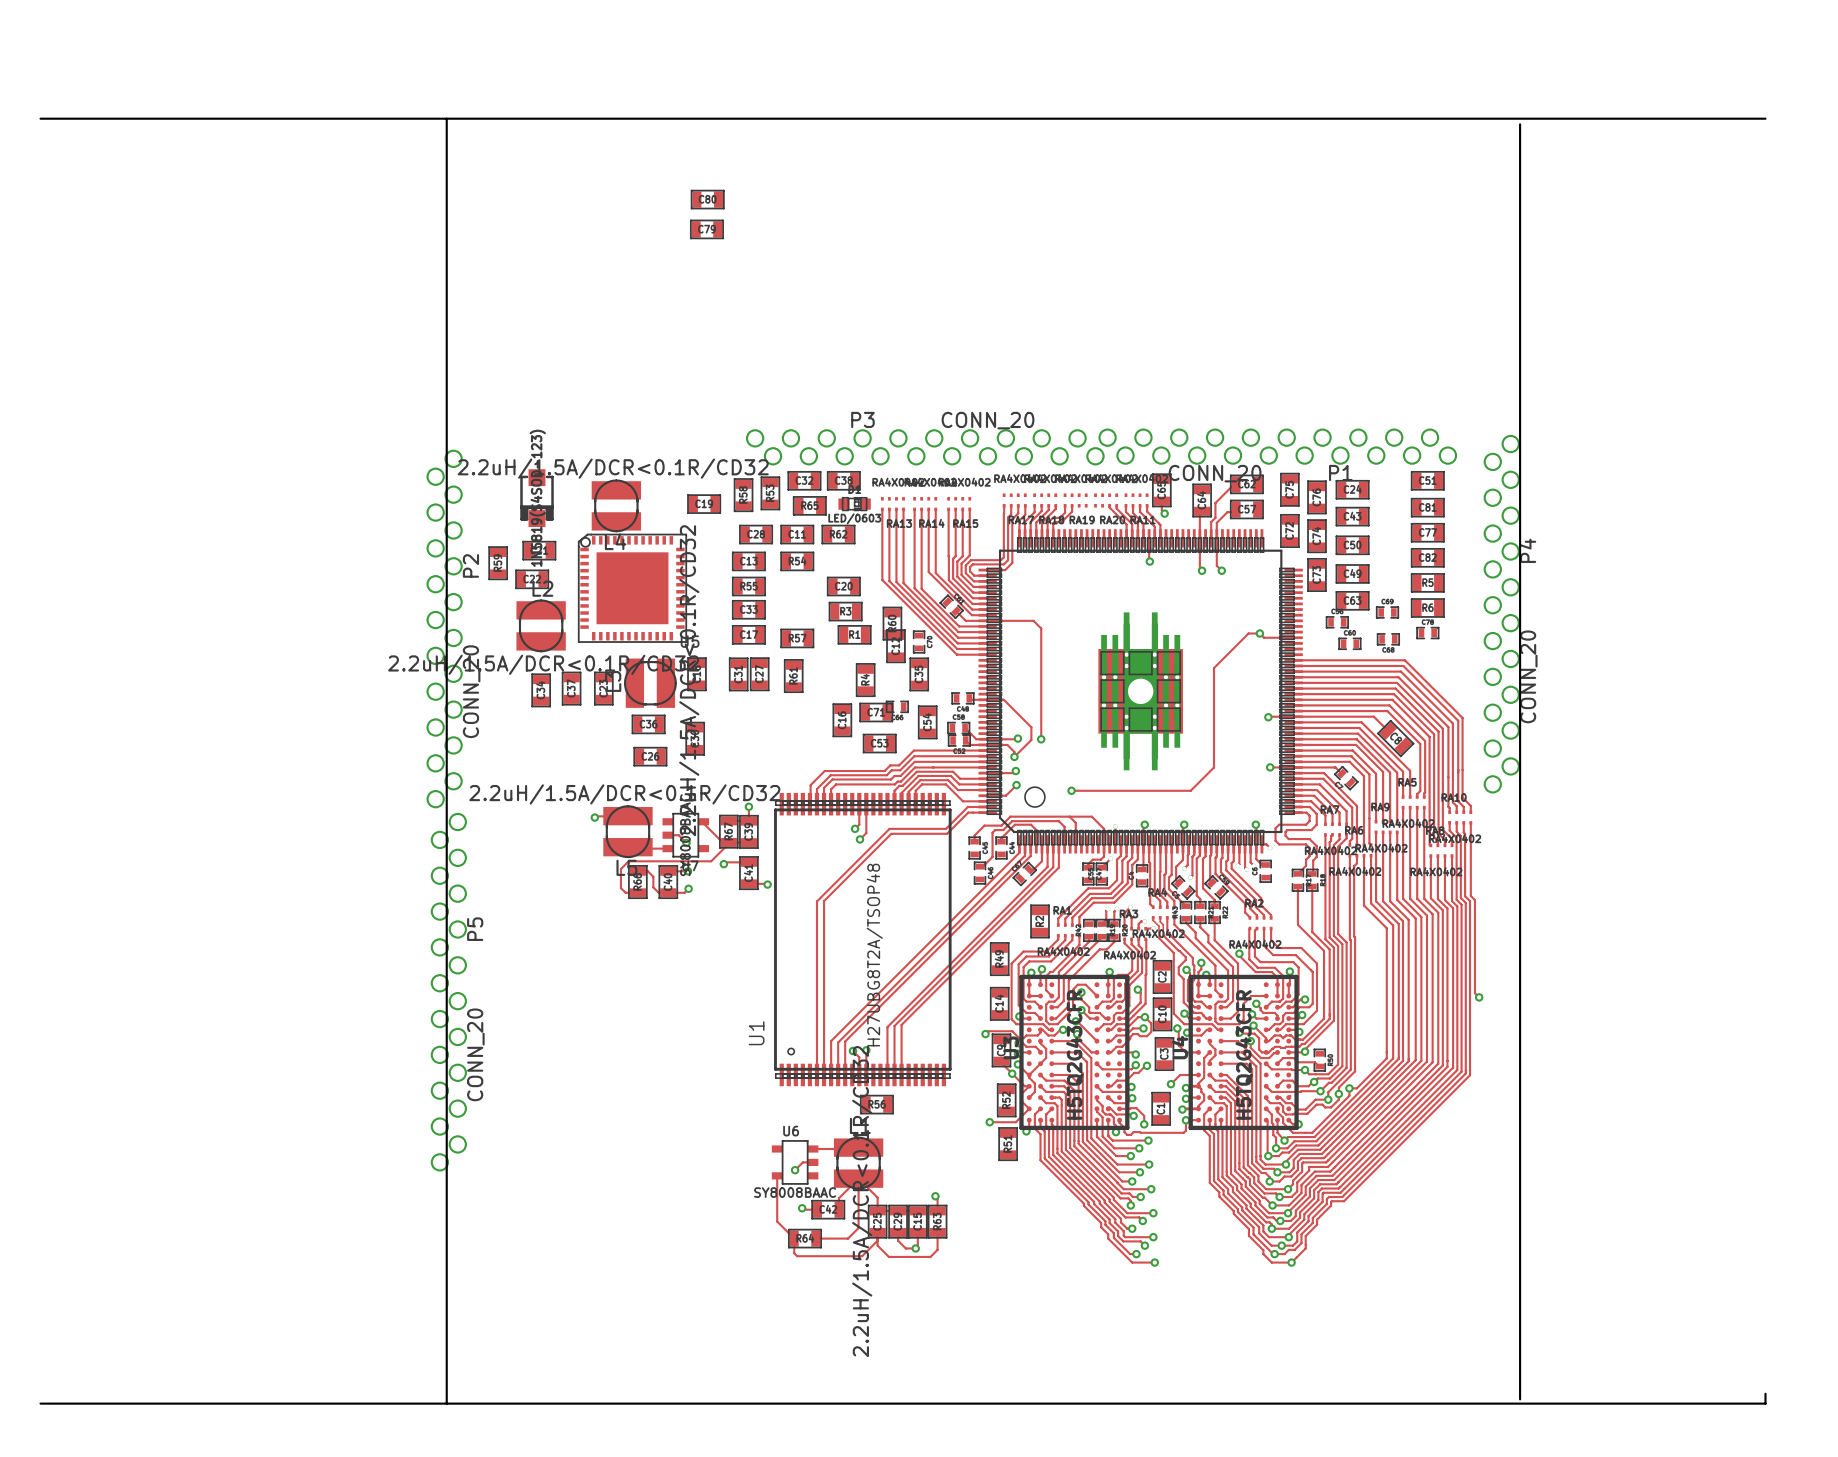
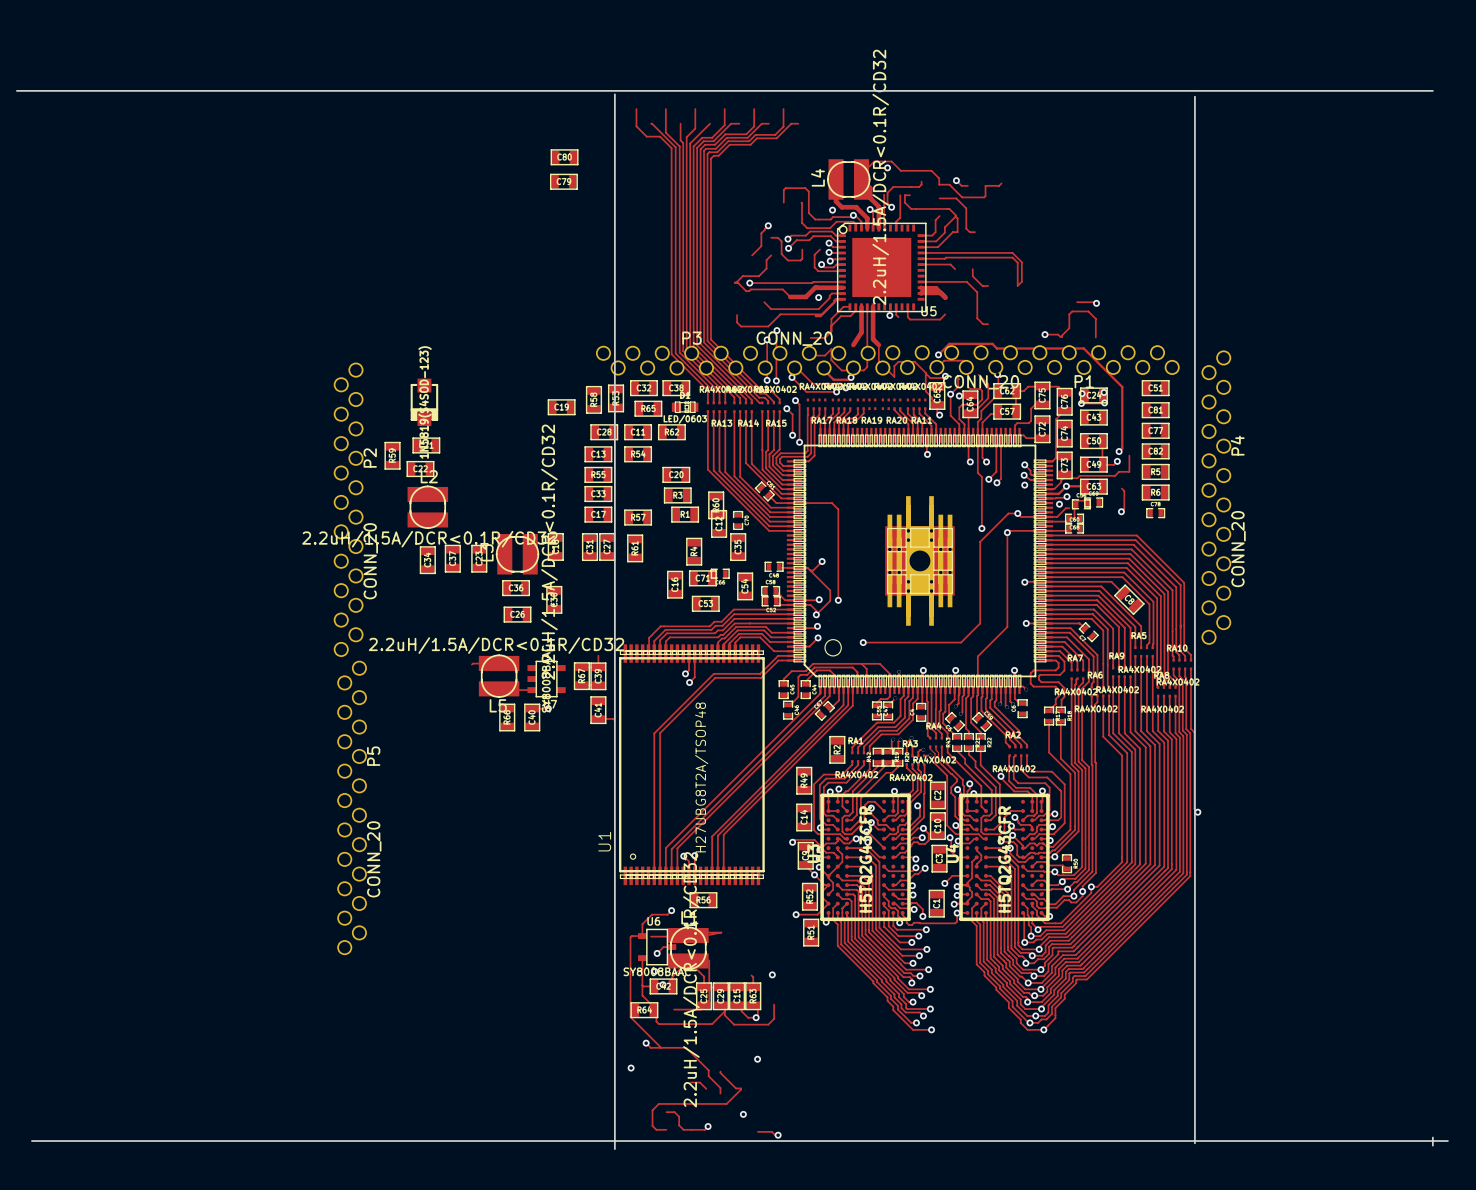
board edge: (446, 118) (446, 1403) -> (614, 94) (614, 1149)
board edge: (1520, 124) (1520, 1399) -> (1194, 96) (1194, 1143)
track: none -> (636, 109) (636, 126) (646, 136) (660, 136) (671, 148) (671, 354) (707, 390) (707, 402)
track: none -> (665, 109) (665, 132) (679, 146) (679, 352) (719, 392) (719, 402)
track: none -> (695, 109) (695, 128) (686, 137) (686, 349) (734, 397) (734, 402)
track: none -> (724, 109) (724, 125) (712, 137) (702, 137) (693, 146) (693, 346) (745, 399) (745, 402)
track: none -> (754, 109) (754, 126) (746, 134) (725, 134) (715, 144) (705, 144) (700, 149) (700, 343) (759, 402) (762, 402)
track: none -> (783, 109) (783, 126) (775, 134) (755, 134) (749, 141) (728, 141) (717, 152) (707, 153) (707, 341) (760, 393) (765, 393) (773, 402)
track: none -> (651, 123) (675, 147) (675, 353) (713, 391) (713, 402)
track: none -> (680, 123) (680, 140) (683, 142) (683, 351) (725, 393) (725, 402)
track: none -> (710, 123) (690, 143) (690, 348) (740, 398) (740, 402)
track: none -> (739, 123) (731, 123) (713, 141) (703, 141) (697, 147) (697, 345) (751, 400) (751, 402)
track: none -> (768, 123) (761, 123) (747, 137) (726, 137) (715, 148) (706, 148) (704, 150) (704, 342) (759, 397) (764, 397) (768, 402)
track: none -> (798, 123) (791, 123) (776, 138) (756, 138) (750, 144) (729, 144) (718, 155) (713, 155) (710, 158) (710, 339) (761, 390) (770, 390) (779, 399) (779, 402)
via: none -> (887, 167)
track: none -> (836, 179) (836, 201) (841, 207) (856, 207) (867, 218) (867, 228)
track: none -> (861, 179) (861, 174) (874, 161) (891, 161) (900, 170) (931, 170) (939, 178) (939, 184) (949, 184) (962, 197) (984, 197) (985, 185) (999, 185) (1001, 183)
track: none -> (861, 179) (870, 188) (870, 197) (878, 206) (878, 228)
track: none -> (956, 180) (961, 185) (967, 185)
via: none -> (956, 180)
track: none -> (921, 181) (919, 186) (893, 186) (887, 192) (887, 203) (891, 207)
track: none -> (884, 194) (884, 228)
track: none -> (900, 195) (900, 217) (896, 221) (896, 228)
track: none -> (909, 195) (904, 195) (904, 202) (911, 208) (949, 208) (955, 216)
track: none -> (939, 198) (956, 198) (966, 208) (966, 228) (969, 232) (974, 232)
track: none -> (783, 202) (783, 190) (785, 188) (805, 188) (808, 191) (808, 213) (815, 219) (830, 219) (833, 217) (855, 215) (861, 221) (861, 228)
track: none -> (801, 202) (802, 222) (807, 228) (830, 228) (836, 221) (853, 221) (855, 228)
via: none -> (891, 207)
via: none -> (832, 210)
track: none -> (870, 209) (873, 212) (873, 228)
via: none -> (870, 209)
via: none -> (853, 215)
track: none -> (939, 216) (935, 220) (935, 232) (932, 235) (921, 235)
track: none -> (955, 216) (957, 218) (957, 232) (952, 232) (937, 247) (921, 247)
track: none -> (955, 216) (944, 227) (944, 232) (936, 241) (921, 241)
track: none -> (768, 225) (761, 233) (761, 246) (752, 255)
via: none -> (768, 225)
track: none -> (842, 235) (836, 235) (831, 231) (809, 231) (805, 235) (791, 235) (787, 239)
track: none -> (771, 237) (778, 237) (781, 241) (781, 254) (787, 260) (800, 260) (802, 249)
via: none -> (787, 239)
track: none -> (842, 241) (836, 241) (830, 236) (813, 236) (809, 240) (796, 240) (788, 248)
track: none -> (829, 243) (833, 247) (842, 247)
via: none -> (829, 243)
via: none -> (788, 248)
track: none -> (819, 249) (814, 254) (814, 267) (818, 271) (845, 271)
track: none -> (829, 252) (842, 253)
via: none -> (829, 252)
track: none -> (921, 252) (1012, 252) (1021, 262) (1021, 281) (1017, 285) (1017, 262) (1012, 257) (921, 258)
track: none -> (771, 255) (766, 260) (766, 268) (759, 276) (742, 276) (736, 282)
track: none -> (842, 258) (830, 261)
via: none -> (830, 261)
track: none -> (821, 264) (824, 267) (842, 264)
via: none -> (821, 264)
track: none -> (921, 264) (950, 264) (955, 269)
track: none -> (972, 269) (972, 276) (982, 285) (988, 285)
track: none -> (842, 281) (749, 283)
track: none -> (921, 281) (966, 281) (977, 292) (977, 318) (983, 324) (988, 324)
track: none -> (734, 282) (737, 282) (746, 291) (750, 289) (782, 289) (790, 296) (805, 296) (815, 287) (842, 287)
via: none -> (749, 283)
track: none -> (921, 287) (936, 288) (945, 297)
track: none -> (940, 292) (921, 293)
track: none -> (842, 293) (831, 293) (818, 309) (771, 309) (764, 302)
via: none -> (818, 297)
track: none -> (1076, 302) (1096, 303)
via: none -> (1096, 303)
track: none -> (849, 306) (843, 306) (831, 318) (831, 331) (825, 337) (810, 337)
track: none -> (855, 306) (855, 310) (850, 316) (841, 316) (831, 325)
track: none -> (861, 306) (861, 332) (853, 345)
track: none -> (867, 306) (867, 367) (863, 370) (841, 370) (831, 360) (831, 349) (825, 355) (810, 355)
track: none -> (873, 306) (873, 339) (878, 345) (878, 361) (894, 376) (894, 366) (898, 361) (914, 361) (925, 372) (925, 391) (937, 404)
track: none -> (896, 306) (896, 314) (898, 317)
track: none -> (907, 306) (907, 317) (910, 319) (940, 319) (945, 314)
track: none -> (737, 315) (737, 322) (741, 326) (768, 326) (780, 314) (822, 314) (834, 302) (834, 300) (835, 299) (842, 299) (837, 299) (820, 316) (815, 316)
via: none -> (889, 315)
track: none -> (776, 330) (776, 380)
via: none -> (776, 330)
track: none -> (1045, 334) (1058, 334) (1061, 336) (1069, 328) (1069, 314) (1072, 311) (1088, 311) (1095, 318) (1095, 337)
via: none -> (1045, 334)
track: none -> (767, 339) (767, 380)
via: none -> (767, 339)
track: none -> (938, 354) (949, 343) (992, 343) (996, 348) (1083, 348) (1122, 387) (1122, 448) (1119, 451)
via: none -> (938, 354)
track: none -> (938, 366) (944, 360) (963, 360) (968, 364) (968, 386) (970, 389) (980, 389) (982, 390) (982, 399) (977, 404) (962, 404) (959, 407) (959, 419) (964, 424) (963, 435)
track: none -> (823, 369) (833, 379) (848, 379) (851, 377)
track: none -> (798, 369) (812, 383) (842, 384) (845, 387)
track: none -> (925, 373) (930, 378) (943, 378) (945, 376)
track: none -> (978, 374) (988, 384) (988, 398) (977, 409) (972, 409) (970, 413)
via: none -> (997, 374)
via: none -> (945, 376)
track: none -> (792, 377) (806, 391) (836, 391)
via: none -> (792, 377)
via: none -> (851, 377)
track: none -> (959, 379) (958, 378) (958, 386) (950, 394) (950, 415) (959, 424) (959, 435)
via: none -> (767, 380)
via: none -> (776, 380)
via: none -> (845, 387)
track: (1236, 484) (1215, 503) (1215, 508) -> (997, 374) (998, 391) (1001, 391) (981, 411)
via: none -> (836, 391)
track: none -> (1064, 392) (1058, 386) (1028, 386) (1023, 391) (1015, 391) (1015, 411)
via: none -> (1104, 392)
via: none -> (1082, 393)
via: none -> (950, 394)
via: none -> (959, 395)
track: none -> (795, 400) (799, 404) (799, 442)
via: none -> (795, 400)
track: none -> (1104, 402) (1081, 403)
via: none -> (1104, 402)
via: none -> (1081, 403)
track: none -> (1042, 404) (1035, 404) (1031, 408) (1031, 420) (1028, 423) (1017, 423) (1014, 425) (1014, 435)
L4 rotation: 0° (616, 505) -> 90° clockwise (848, 179)
L4 position: (616, 505) -> (848, 179)
track: none -> (786, 408) (792, 414) (792, 435)
via: none -> (786, 408)
track: none -> (1064, 410) (1056, 419) (1056, 457) (1052, 461) (1045, 461)
via: none -> (792, 435)
track: none -> (977, 435) (977, 472) (981, 477) (981, 528)
track: none -> (996, 435) (996, 471) (988, 479)
track: none -> (1000, 435) (1000, 478) (996, 482)
track: none -> (1019, 435) (1023, 435) (1026, 438) (1042, 438)
track: none -> (1102, 441) (1102, 464) (1113, 464) (1117, 461)
via: none -> (799, 442)
via: none -> (1119, 451)
track: none -> (1129, 455) (1129, 471) (1119, 471) (1115, 475) (1079, 475) (1077, 478) (1063, 478) (1054, 489) (1045, 489)
via: none -> (1117, 461)
track: none -> (1024, 464) (1030, 470) (1031, 475) (1045, 475)
via: none -> (1024, 464)
track: none -> (1024, 475) (1030, 479) (1045, 479)
via: none -> (1024, 475)
U5 position: (632, 588) -> (881, 267)
via: none -> (988, 479)
track: none -> (1085, 479) (1085, 486) (1066, 486) (1058, 493) (1045, 493)
via: none -> (996, 482)
via: none -> (1024, 485)
via: none -> (1066, 486)
track: none -> (1121, 488) (1124, 491) (1124, 508) (1121, 511)
part position: (1387, 612) -> (1093, 502)
track: none -> (1067, 496) (1045, 498)
via: none -> (1067, 496)
track: none -> (1088, 502) (1077, 500) (1074, 503) (1073, 518) (1069, 518) (1066, 521) (1045, 521)
via: none -> (1059, 504)
track: none -> (1069, 508) (1065, 508) (1057, 516) (1045, 516)
via: none -> (1121, 511)
part position: (1388, 639) -> (1074, 518)
part position: (1349, 643) -> (1074, 528)
via: none -> (981, 528)
track: none -> (1069, 528) (1066, 530) (1009, 530) (1007, 532) (1007, 626) (977, 656) (977, 686)
via: none -> (1007, 532)
track: none -> (822, 561) (813, 570) (810, 570)
via: none -> (822, 561)
via: (748, 806) -> none
via: (594, 817) -> none
track: (703, 821) (722, 842) (728, 843) (711, 861) (628, 861) (620, 869) (620, 888) (625, 892) (637, 892) -> none
track: (667, 835) (678, 835) (686, 842) -> none
via: (686, 842) -> none
track: (748, 862) (725, 862) (723, 864) -> none
via: (723, 864) -> none
track: (637, 871) (647, 871) (653, 876) (653, 887) (658, 892) (684, 892) (688, 888) -> none
via: (767, 884) -> none
via: (688, 888) -> none
via: none -> (671, 910)
track: none -> (685, 932) (721, 932) (709, 934)
U6 position: (795, 1162) -> (657, 947)
track: (813, 1162) (802, 1162) (795, 1170) -> (671, 947) (663, 947) (657, 953)
via: none -> (657, 953)
via: (795, 1170) -> none
track: (777, 1175) (777, 1221) (794, 1238) (794, 1253) -> (671, 910) (667, 914) (651, 914) (642, 924) (642, 936) (630, 937) (630, 1017) (635, 1022)
track: none -> (642, 958) (642, 995) (656, 1009) (656, 1021) (658, 1024) (712, 1024) (724, 1011)
track: (858, 1178) (858, 1228) (848, 1238) (815, 1238) -> (709, 960) (709, 1000) (700, 1009) (674, 1009)
via: none -> (654, 971)
via position: (935, 1196) -> (772, 974)
via: none -> (662, 984)
via: (802, 1208) -> none
track: (877, 1232) (877, 1245) (888, 1256) (930, 1256) (937, 1249) (937, 1232) -> (724, 1004) (724, 1015) (734, 1024) (768, 1024) (774, 1018) (774, 1004)
track: (898, 1232) (898, 1240) (905, 1248) (915, 1248) (917, 1246) (917, 1232) -> (741, 1004) (741, 1011) (748, 1017) (757, 1015) (757, 1004)
track: (877, 1240) (862, 1256) (797, 1256) -> (661, 1047) (638, 1024)
via position: (915, 1248) -> (756, 1017)
track: none -> (646, 1043) (650, 1047) (686, 1047) (708, 1070) (708, 1076) (720, 1087) (720, 1093)
via: none -> (646, 1043)
via: none -> (757, 1059)
via: none -> (631, 1068)
track: none -> (720, 1071) (736, 1088) (741, 1089) (726, 1103) (658, 1103) (652, 1110) (652, 1125) (656, 1129) (666, 1129)
track: none -> (691, 1082) (699, 1082) (706, 1088)
track: none -> (666, 1112) (674, 1112) (679, 1116) (679, 1125) (683, 1129) (704, 1129) (708, 1126)
via: none -> (743, 1114)
via: none -> (708, 1126)
track: none -> (757, 1131) (771, 1131) (775, 1135) (777, 1134)
via: none -> (778, 1135)
board edge: (40, 1403) (1765, 1403) -> (31, 1141) (1447, 1141)

